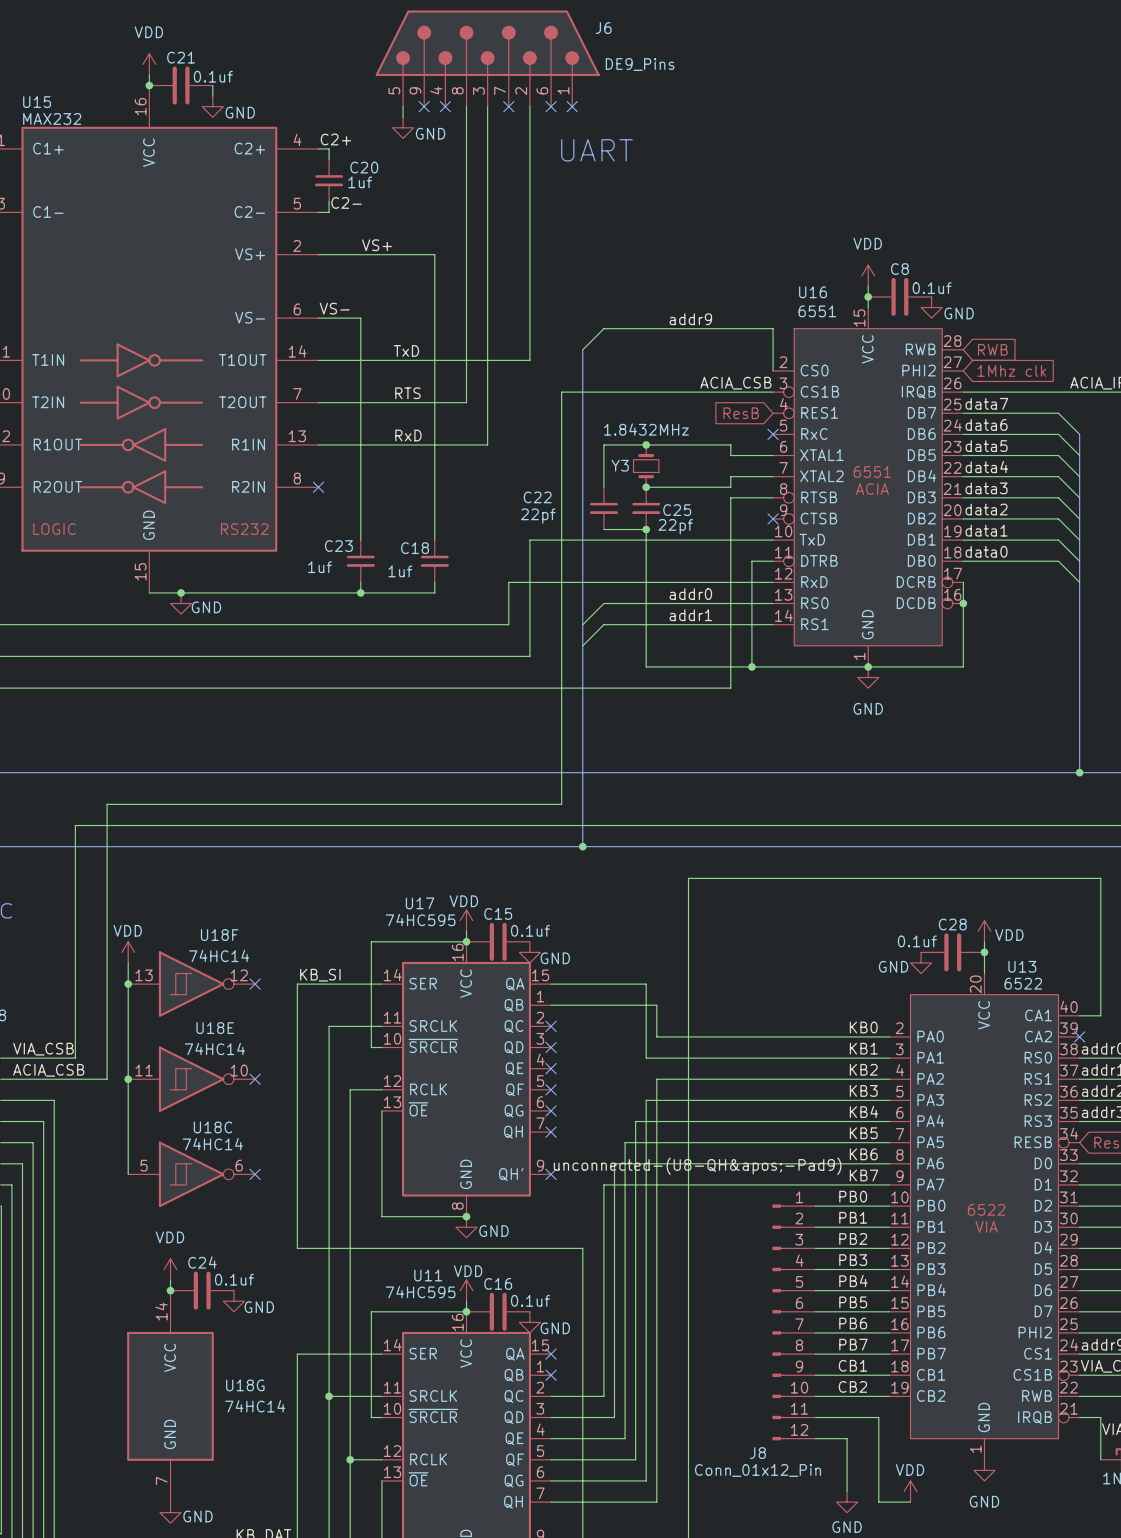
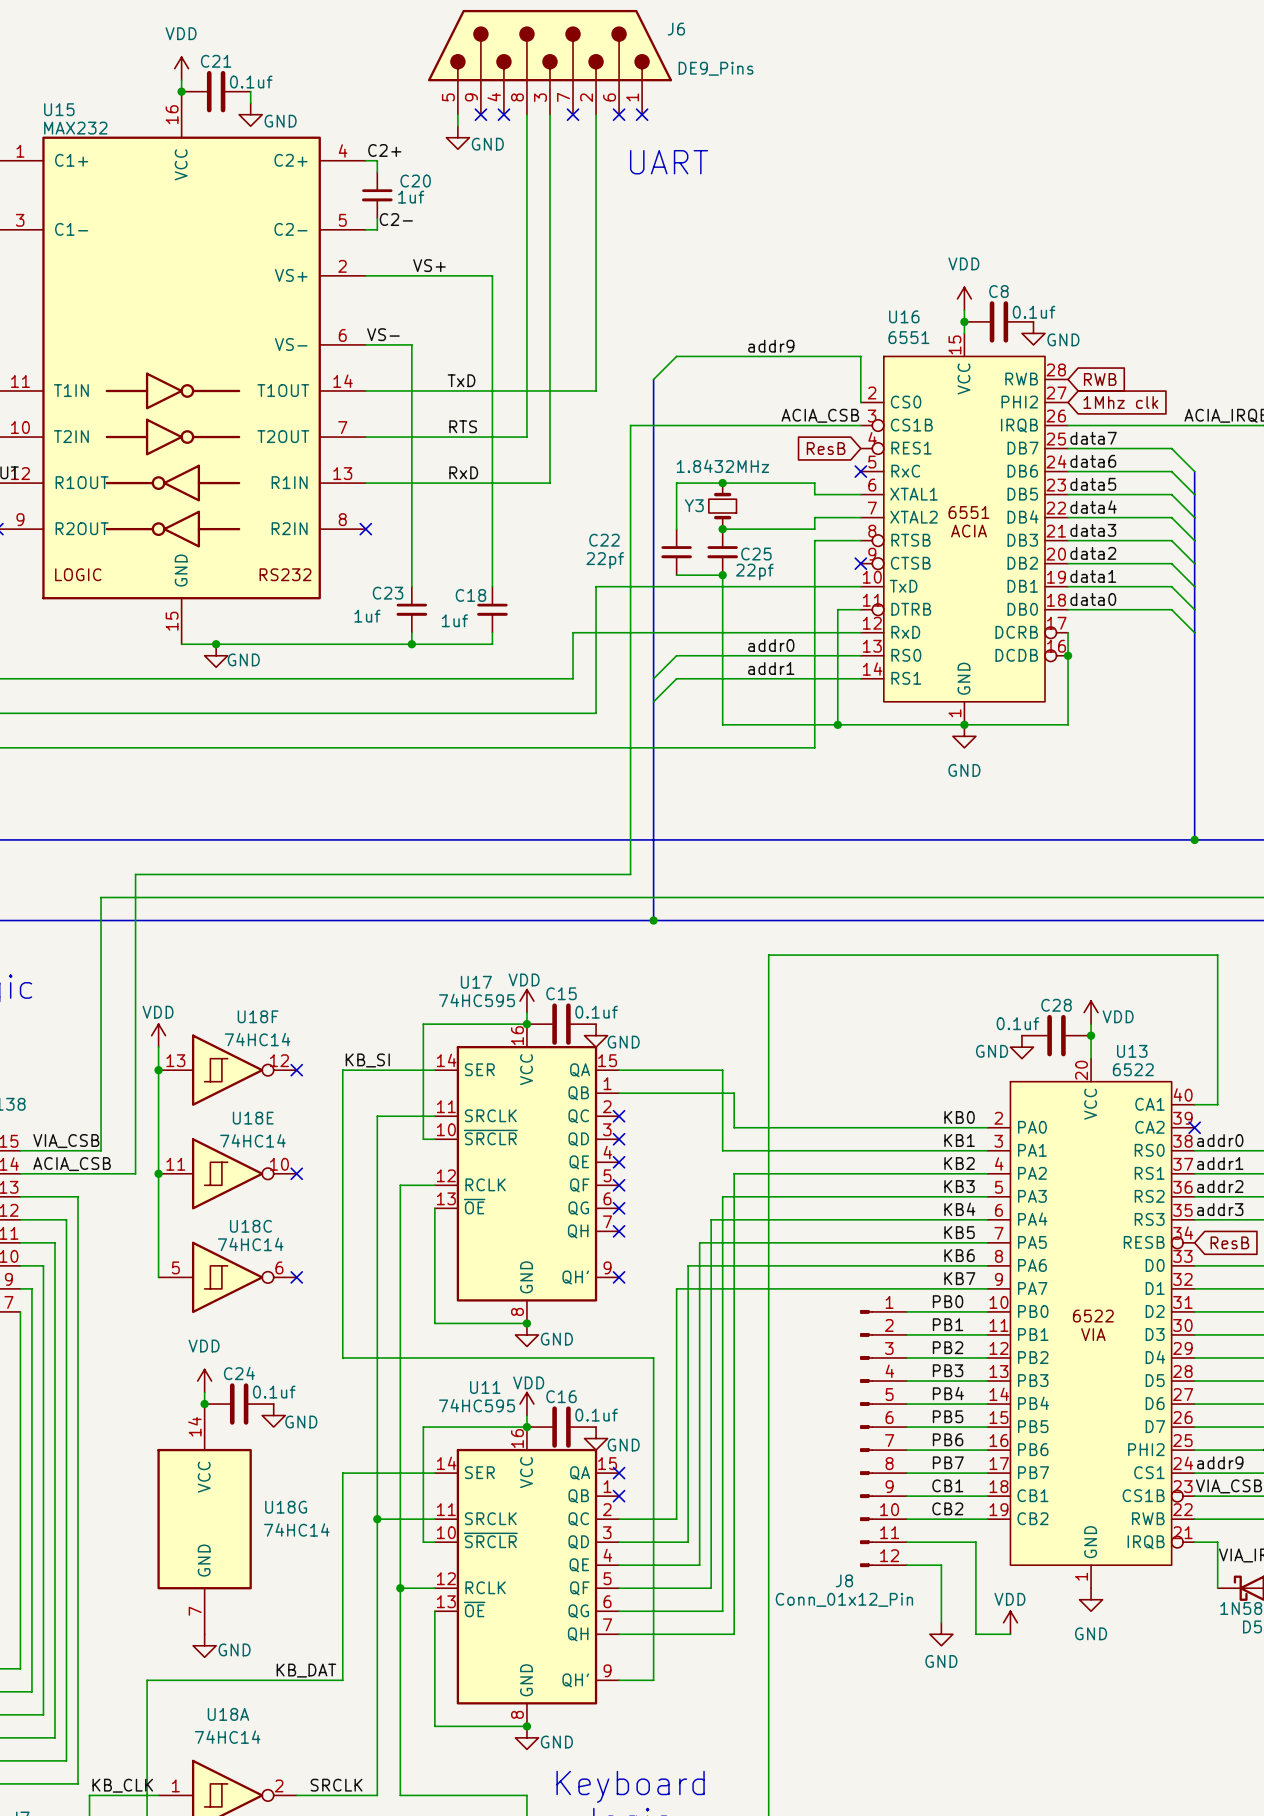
label: unconnected-(U8-QH&apos;-Pad9) (697, 1166) -> none

